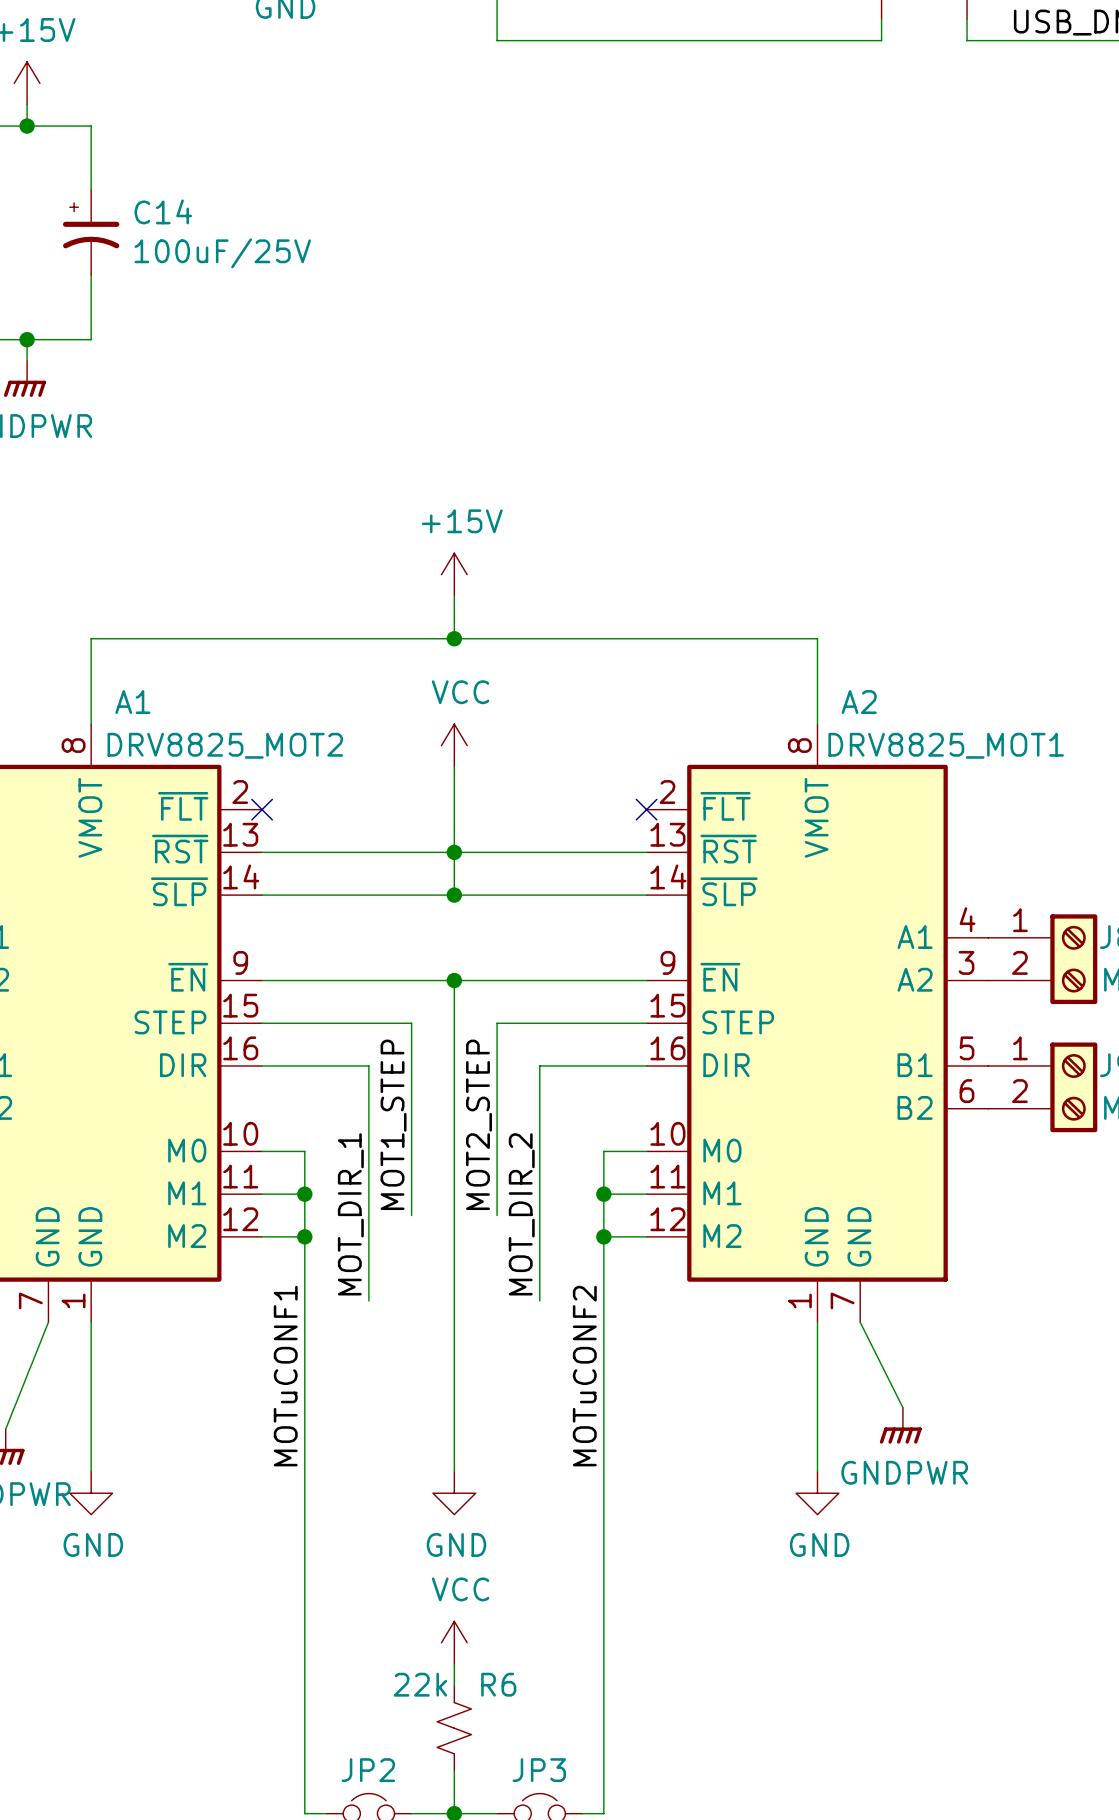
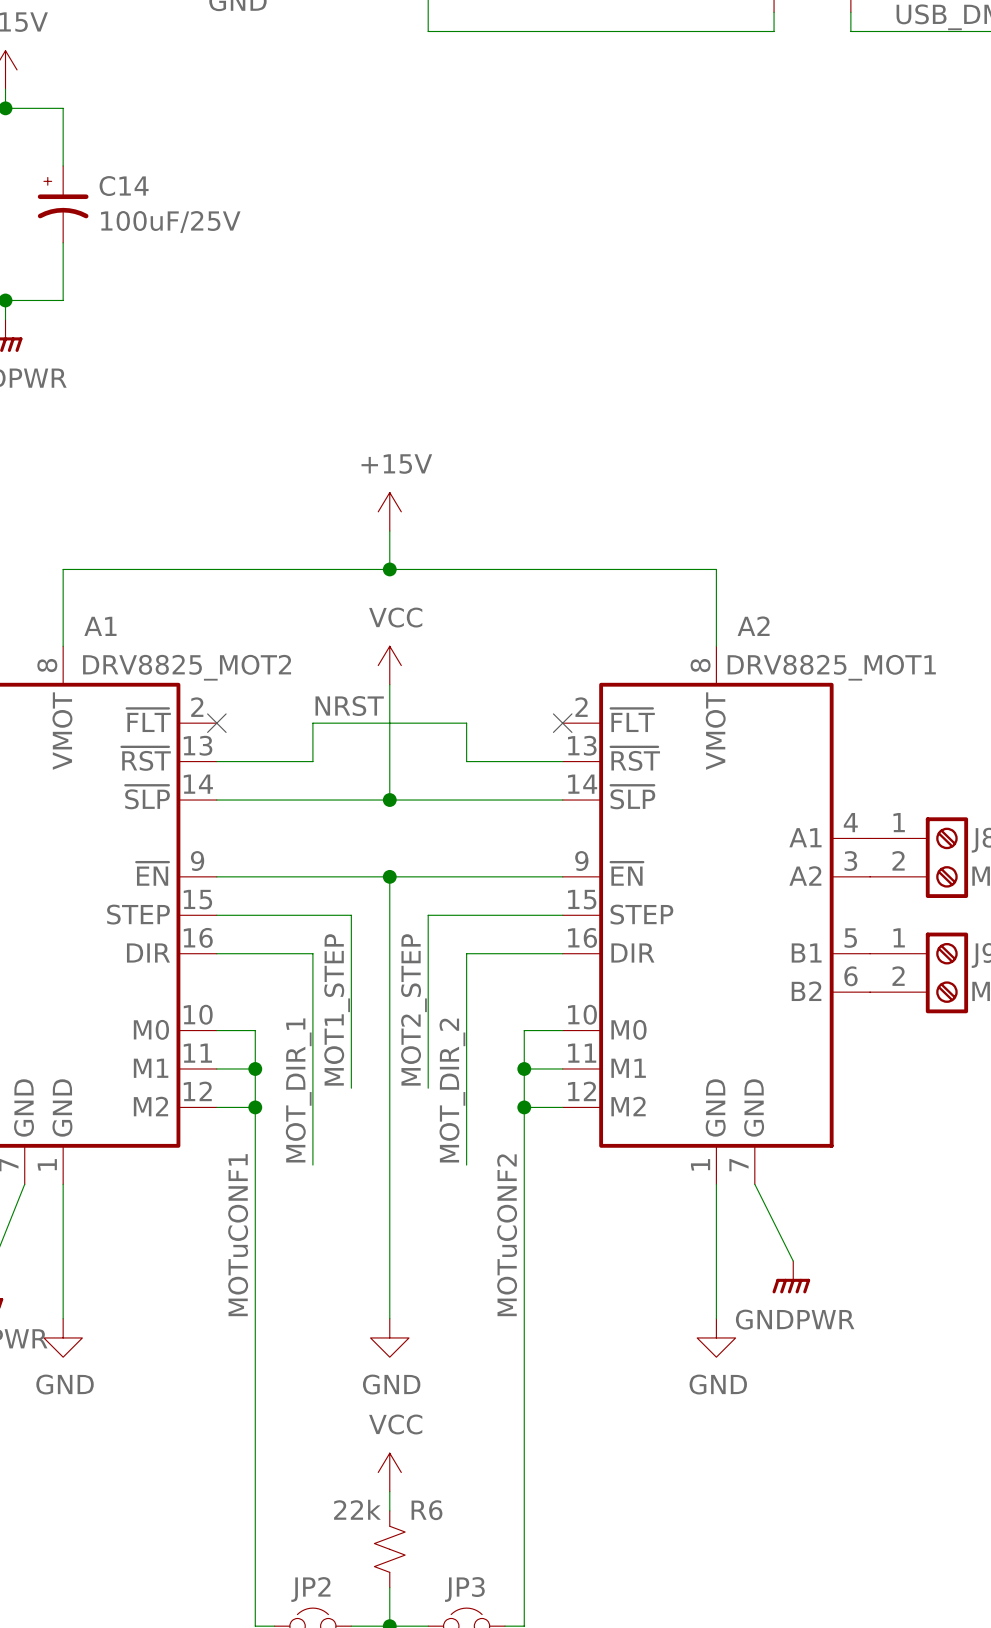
label: none -> NRST (349, 706)
wire: (368, 852) (539, 852) -> (312, 761) (312, 723) (466, 723) (466, 761)
junction: (454, 852) -> none

